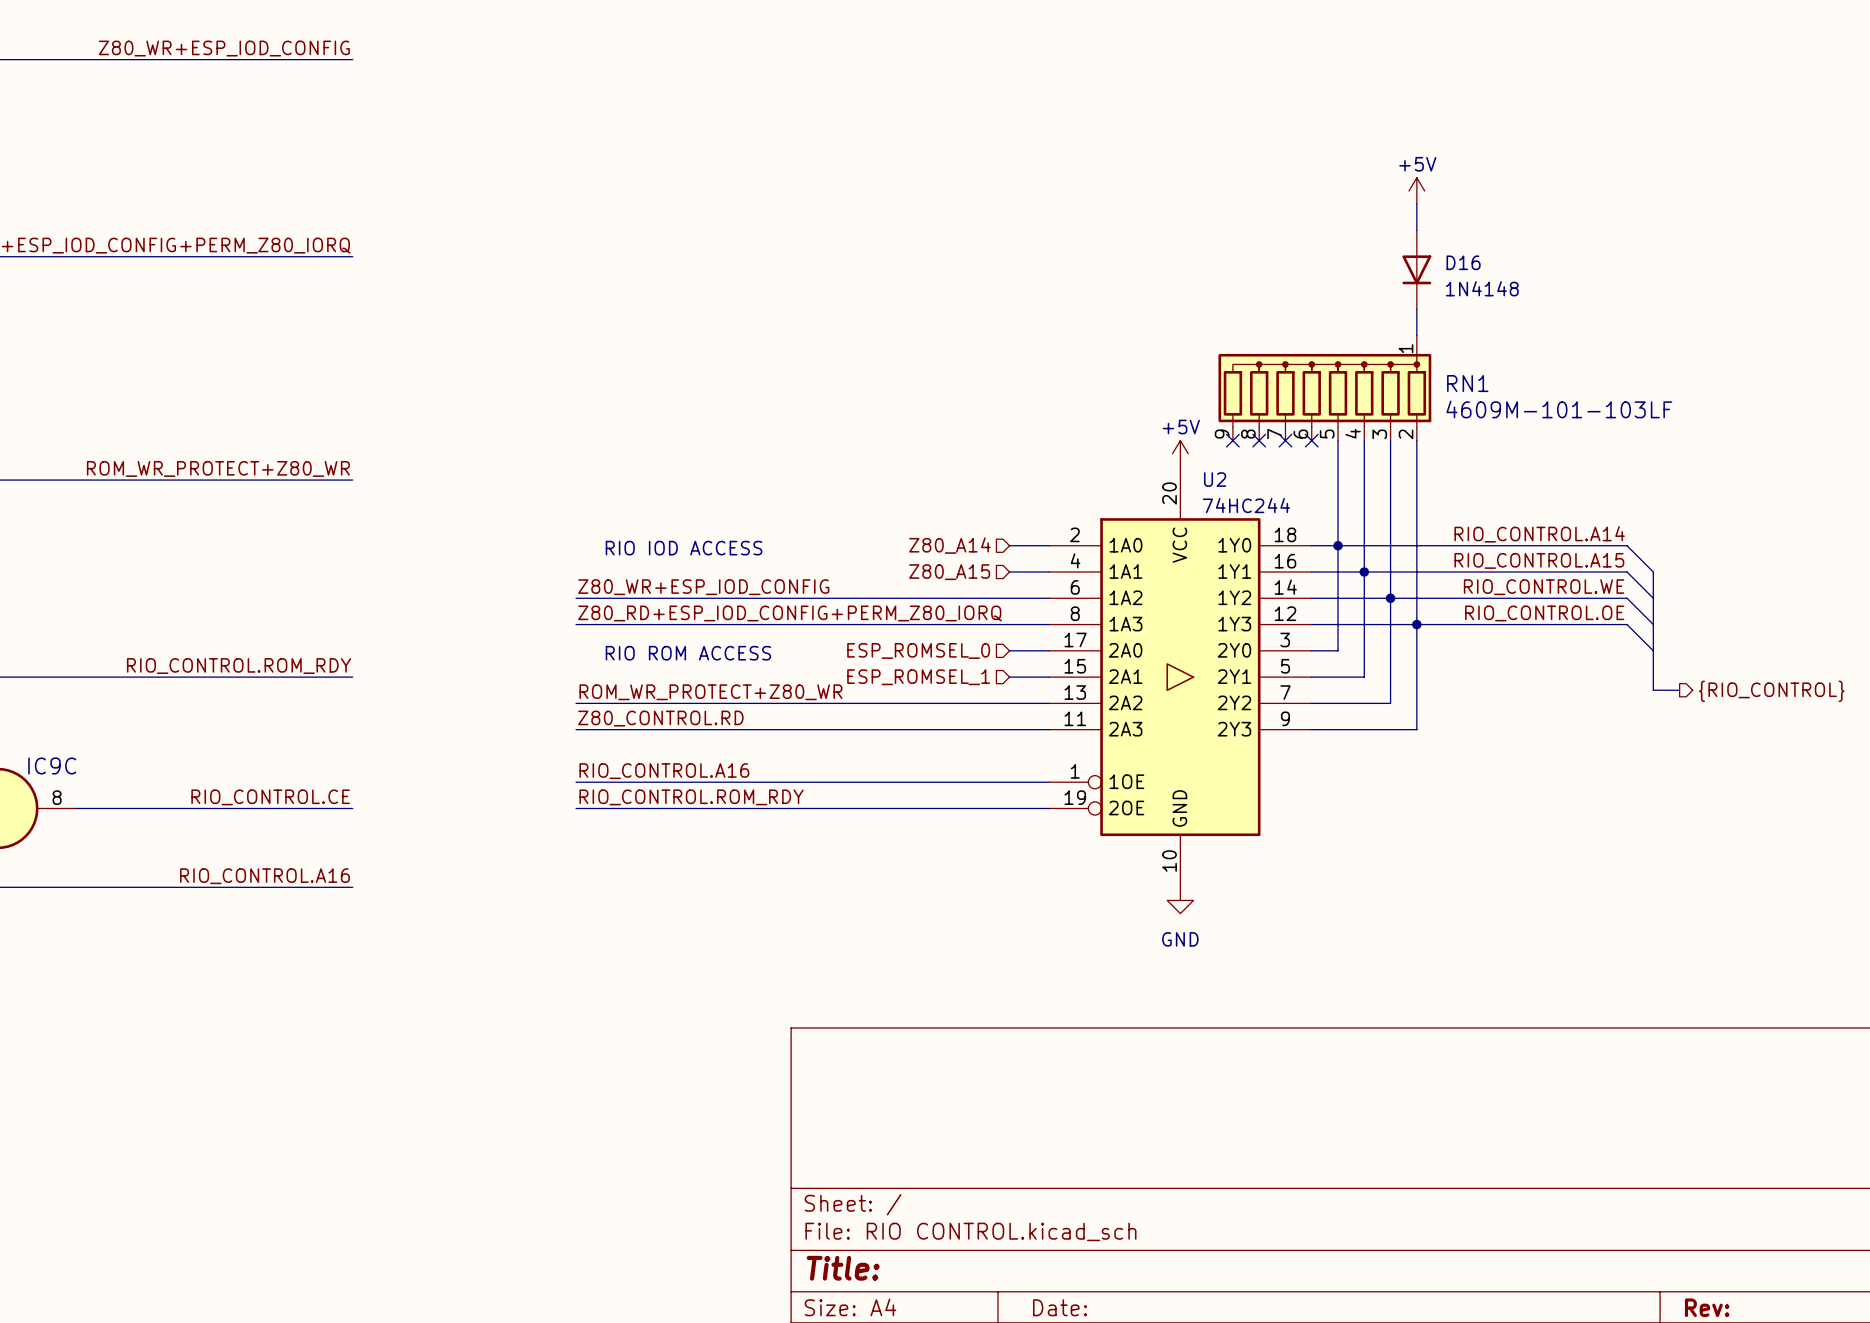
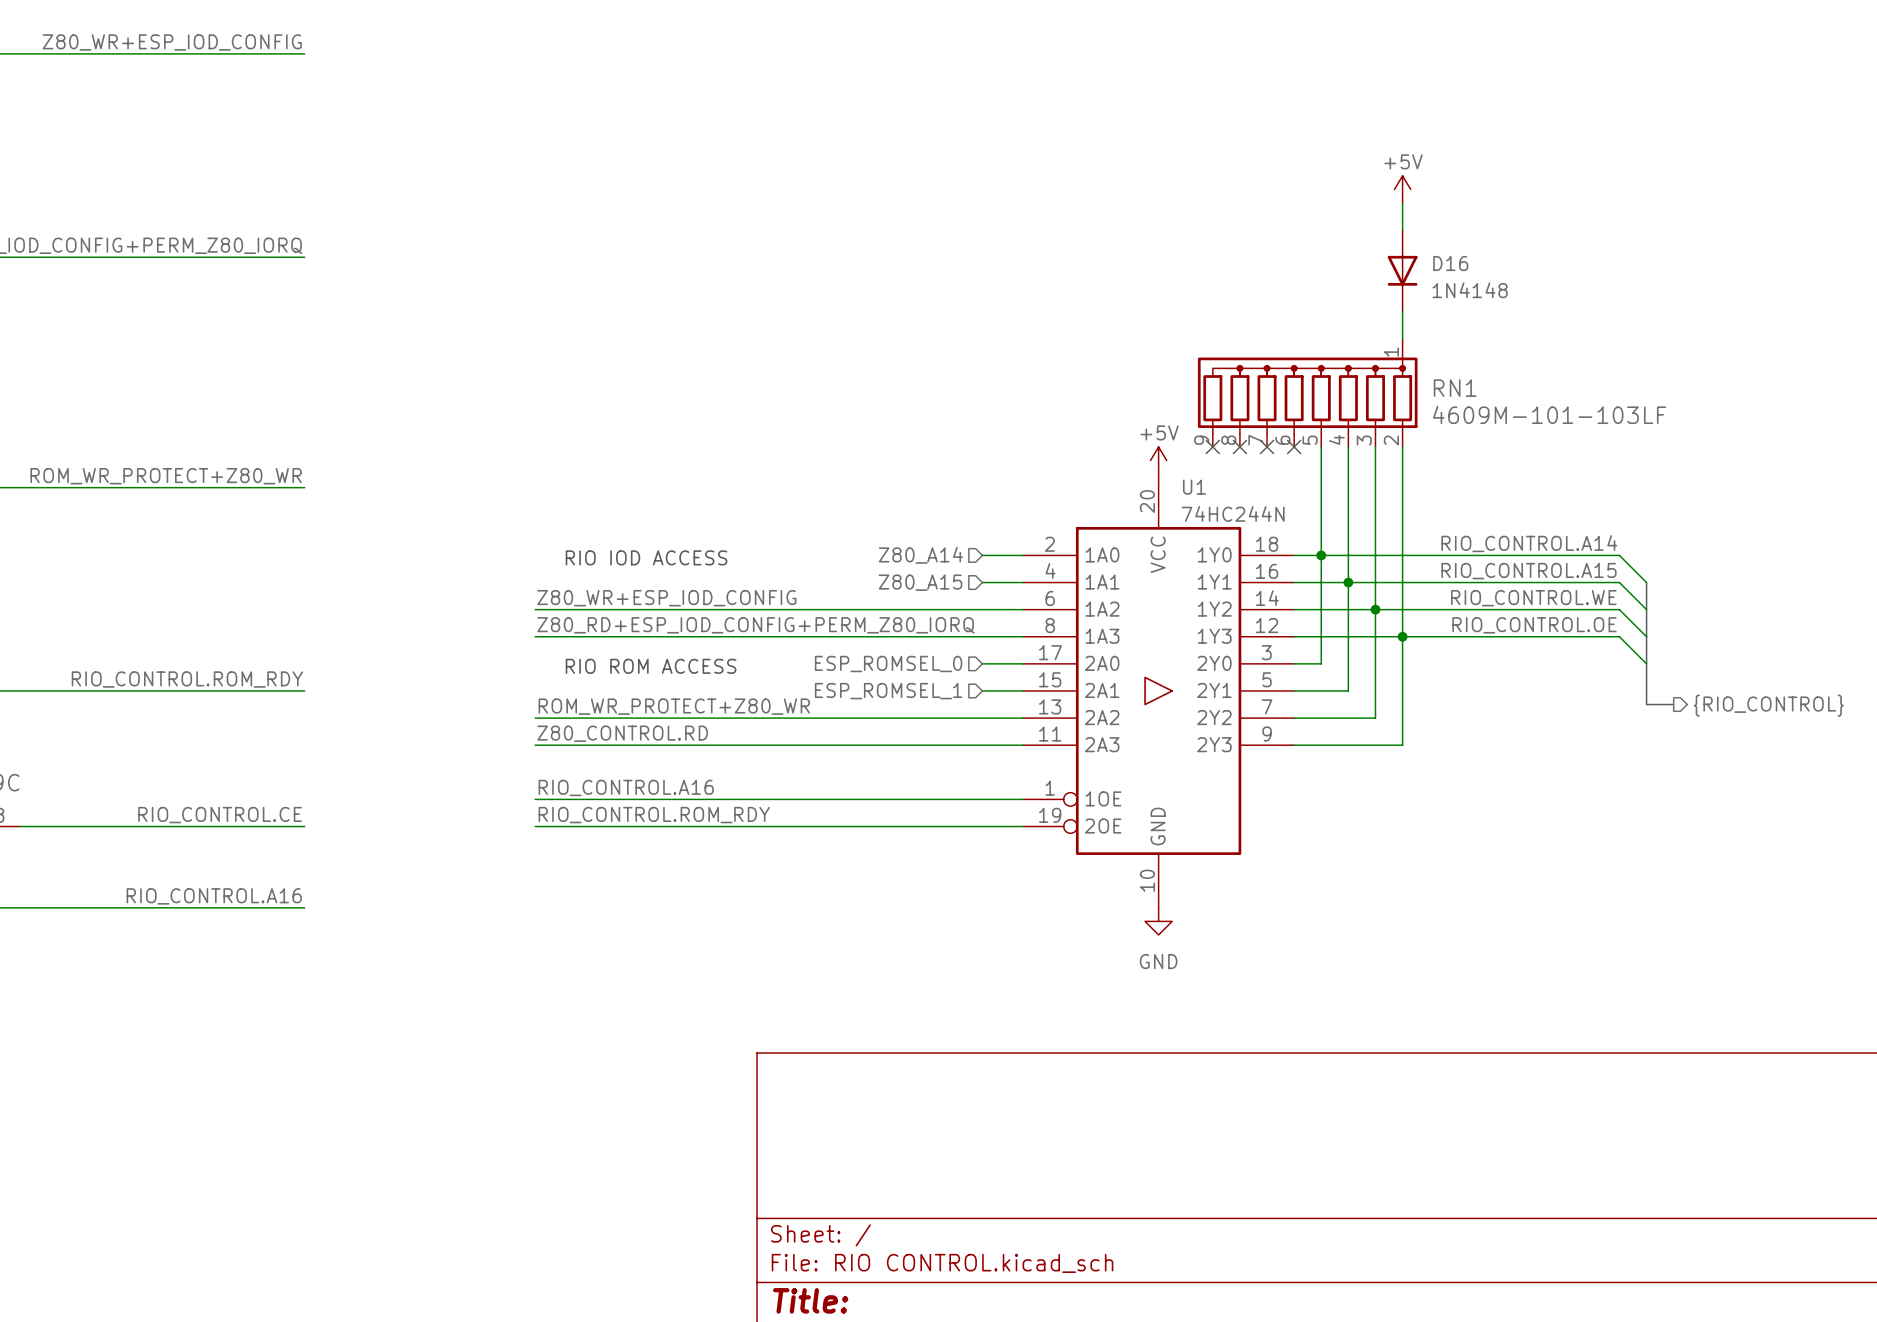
U2 name: U2 (1215, 479) -> U1 (1194, 487)
U2 value: 74HC244 (1246, 505) -> 74HC244N (1233, 513)

